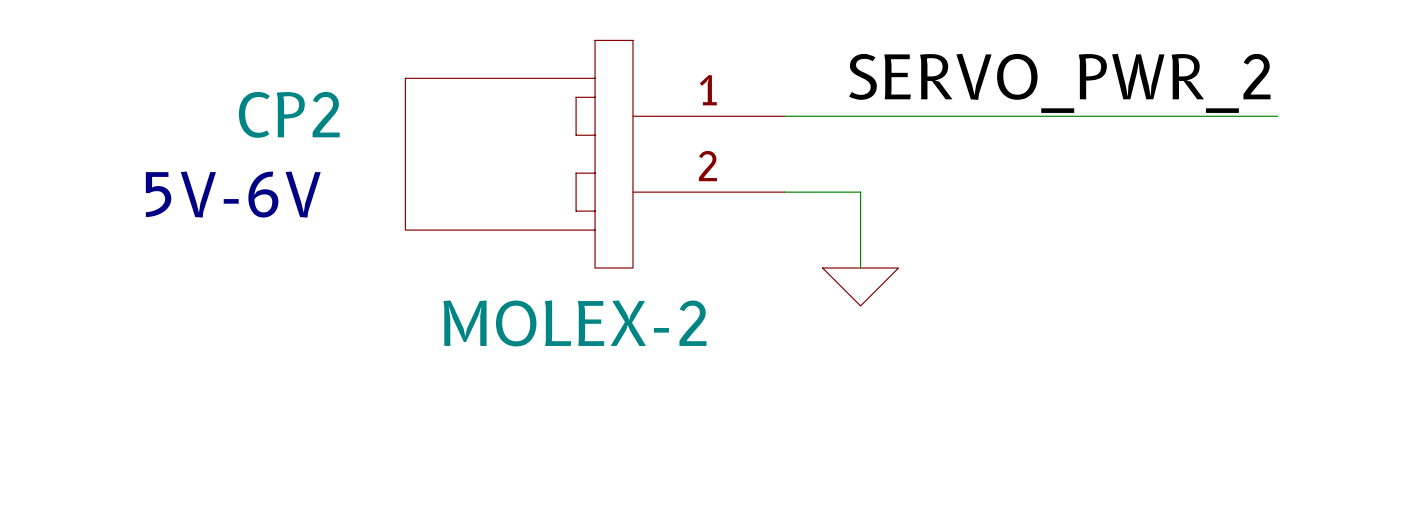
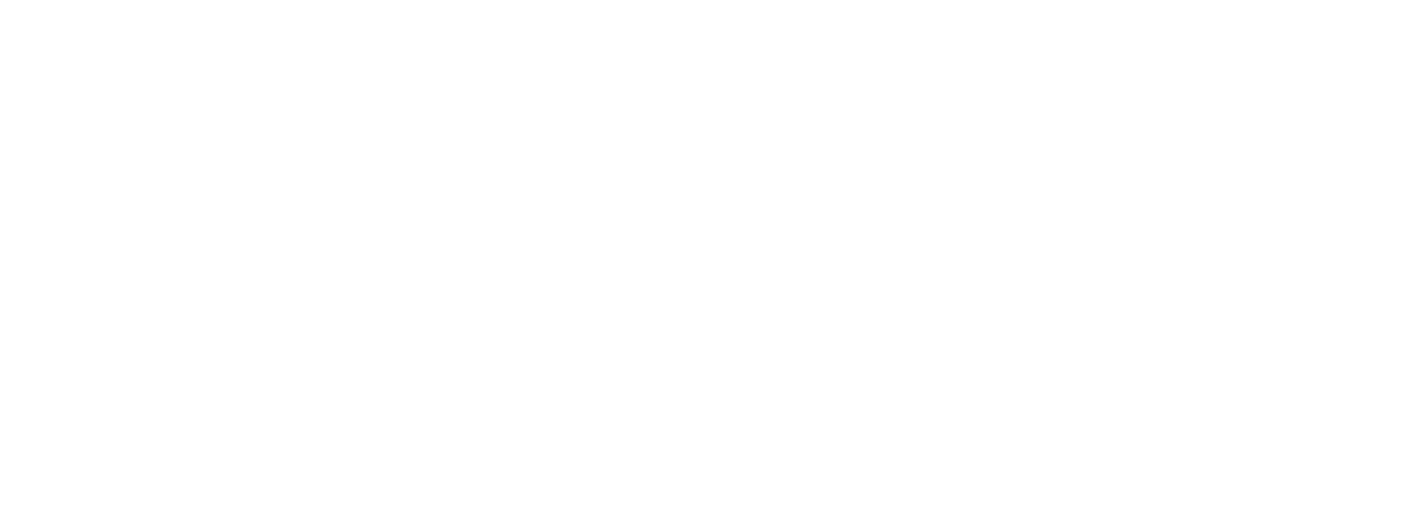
label: SERVO_PWR_2 (1059, 83) -> none
wire: (784, 116) (1277, 116) -> none
CP2: MOLEX-2 (595, 154) -> none
wire: (784, 192) (860, 192) (860, 268) -> none
text: 5V-6V (233, 194) -> none
power symbol: (860, 286) -> none

